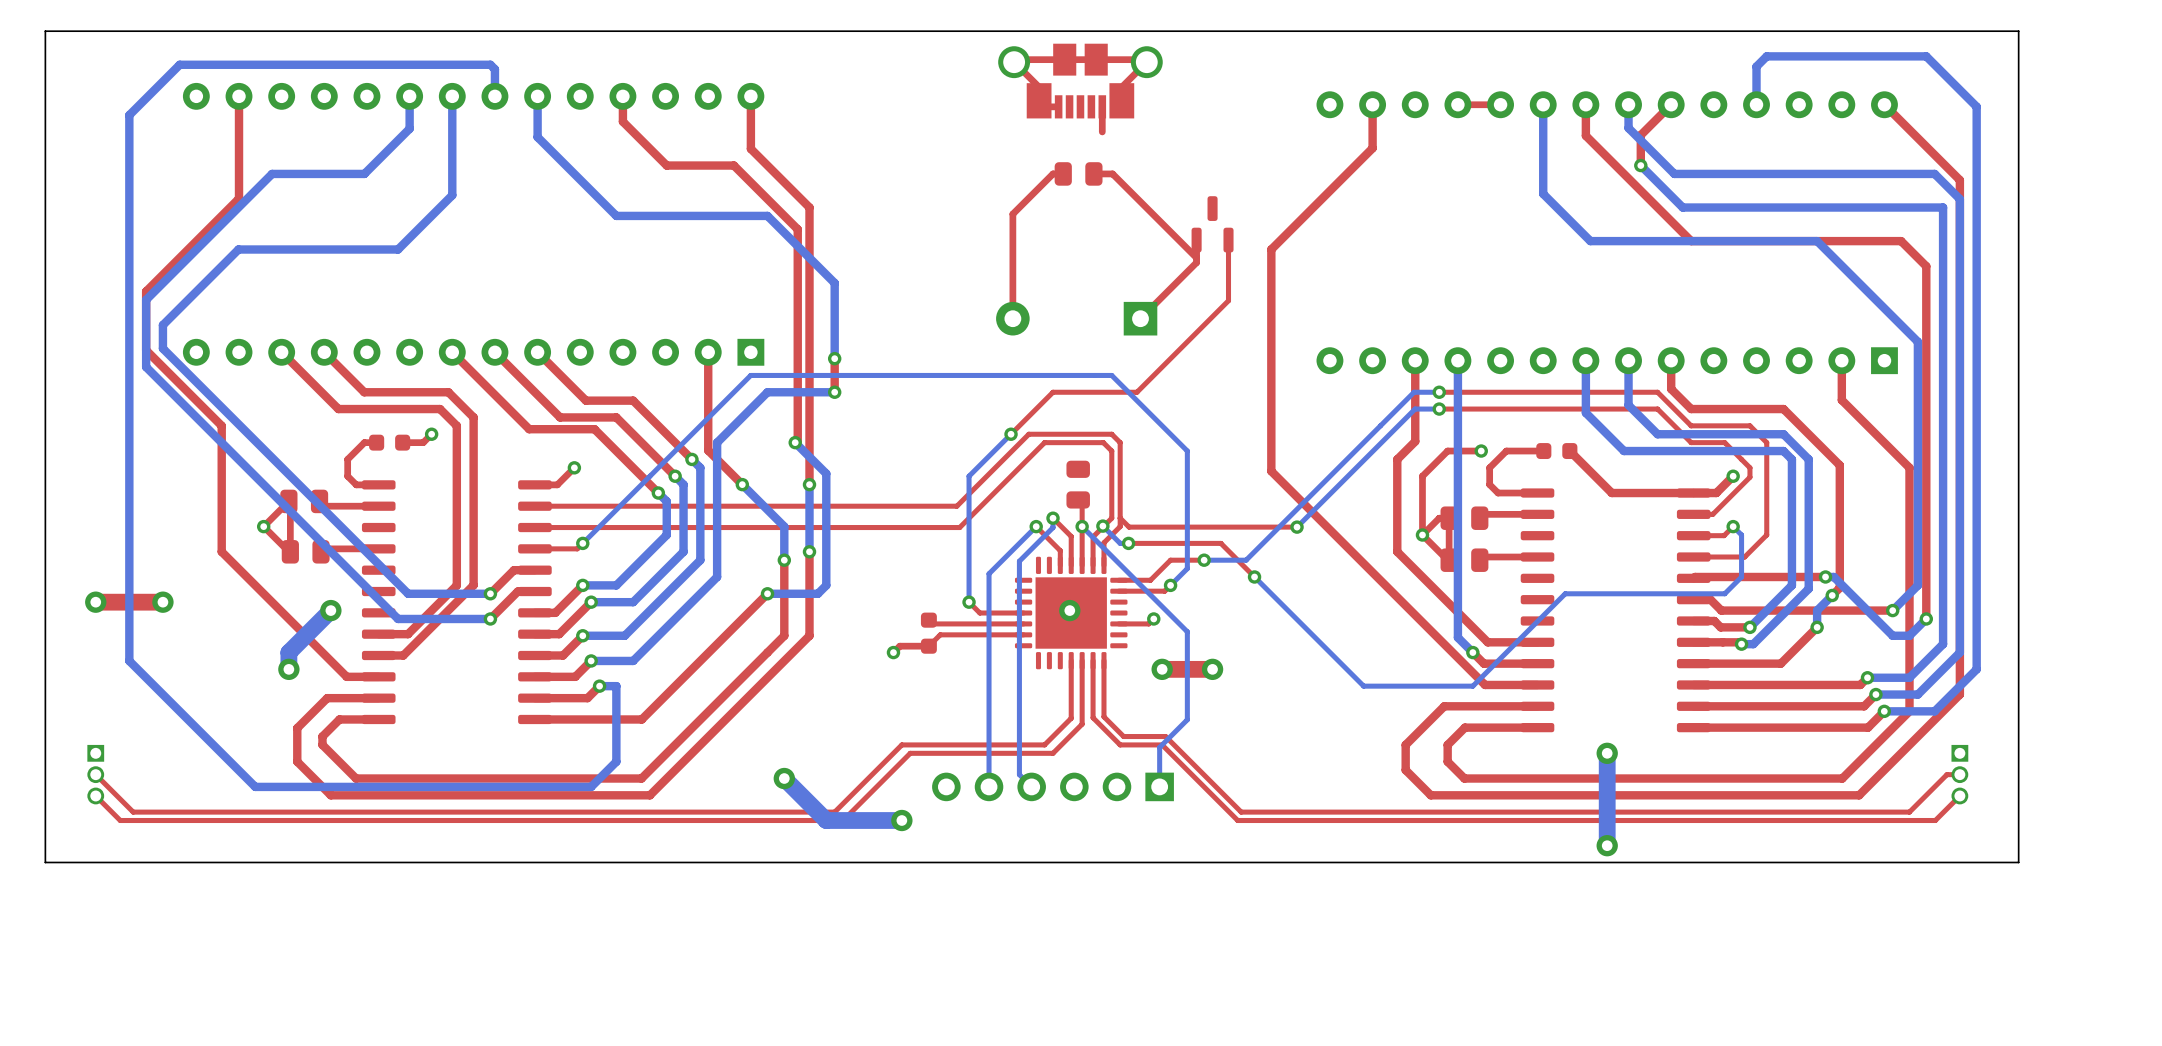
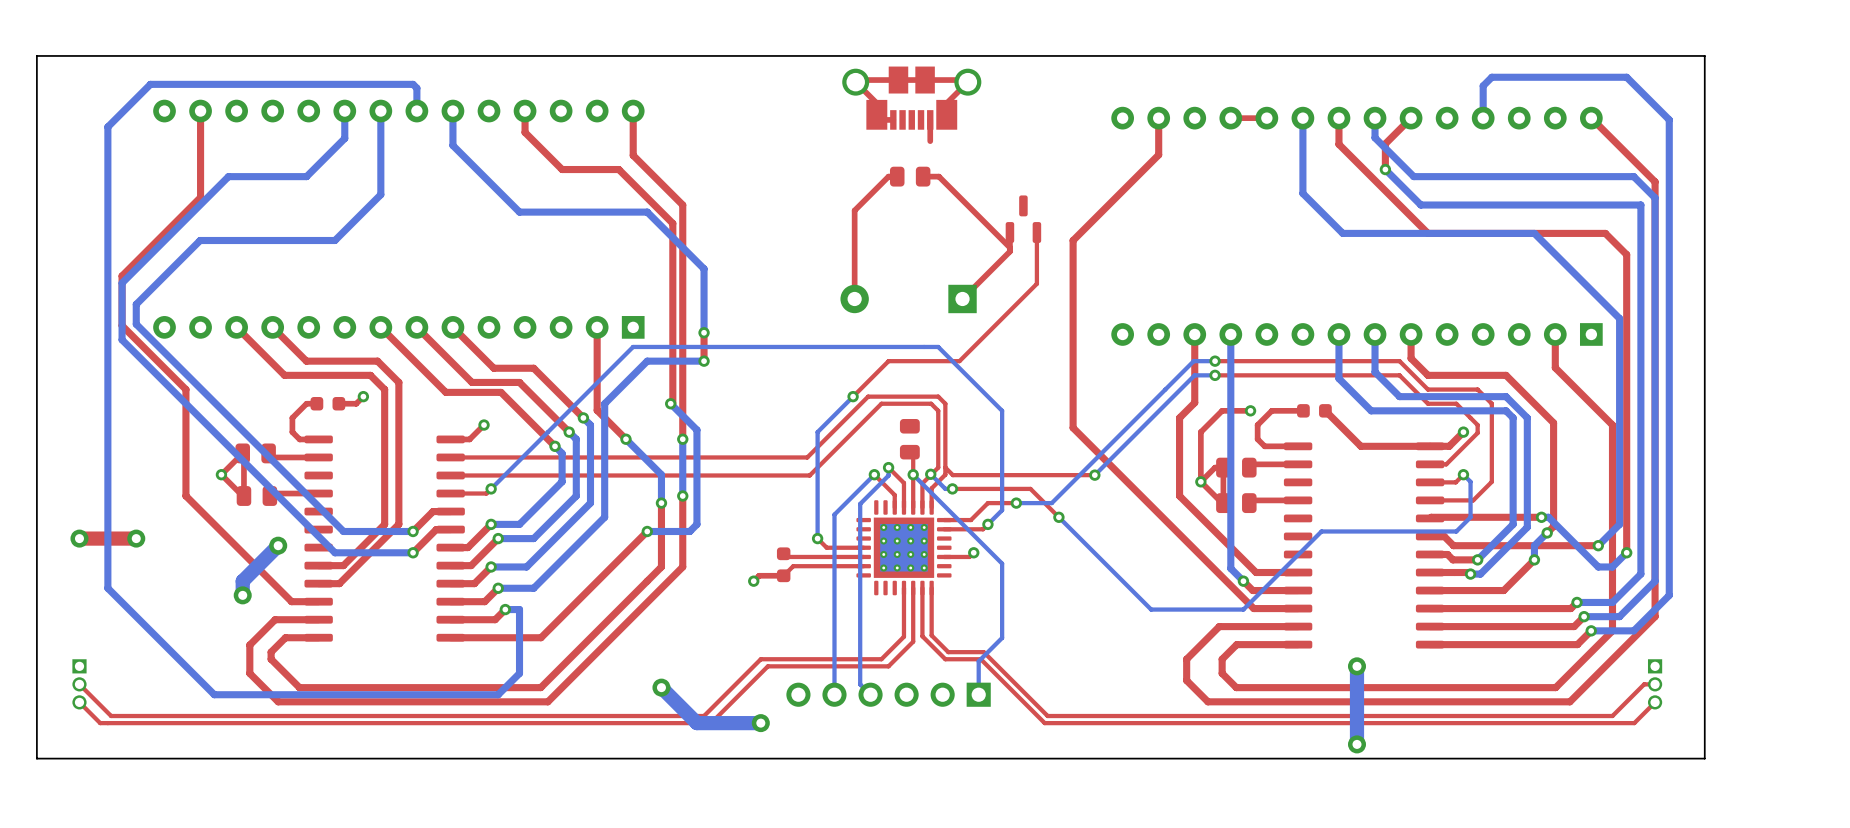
part footprint: [1014, 556, 1128, 670] -> [856, 500, 952, 596]
via: (1069, 610) -> none
via: (1162, 669) -> none
top track: (1212, 669) (1162, 669) -> none
via: (1212, 669) -> none

